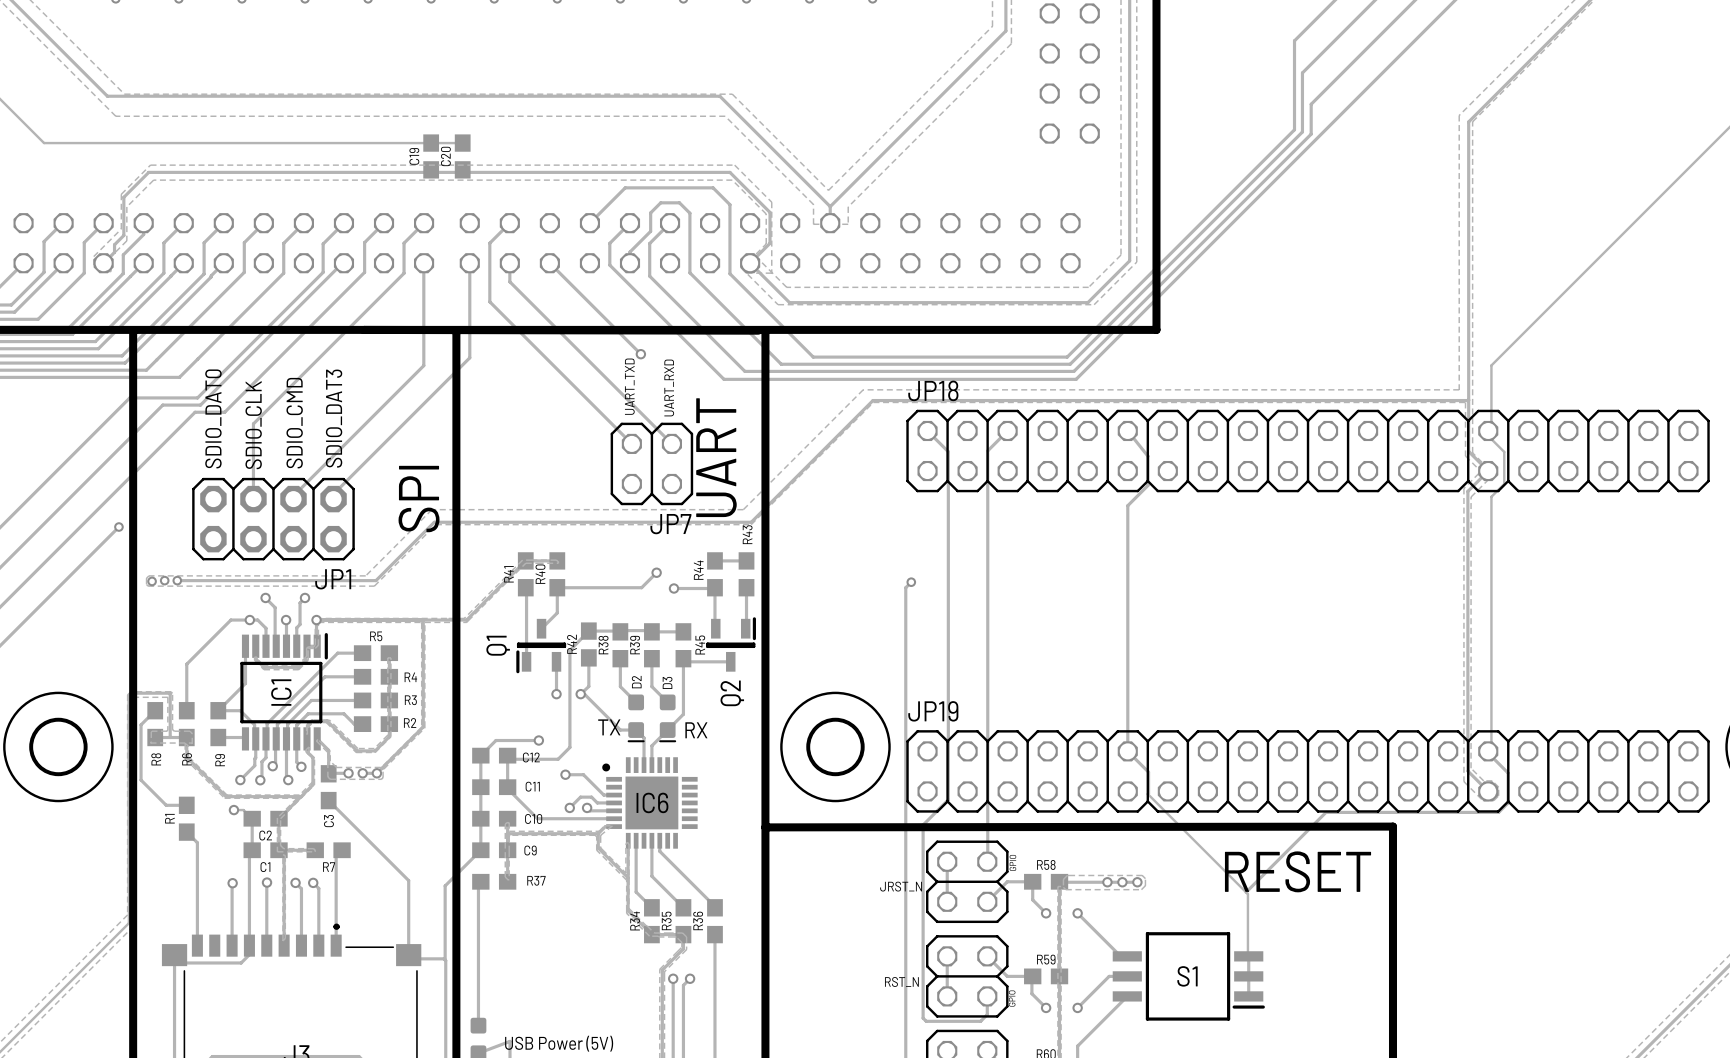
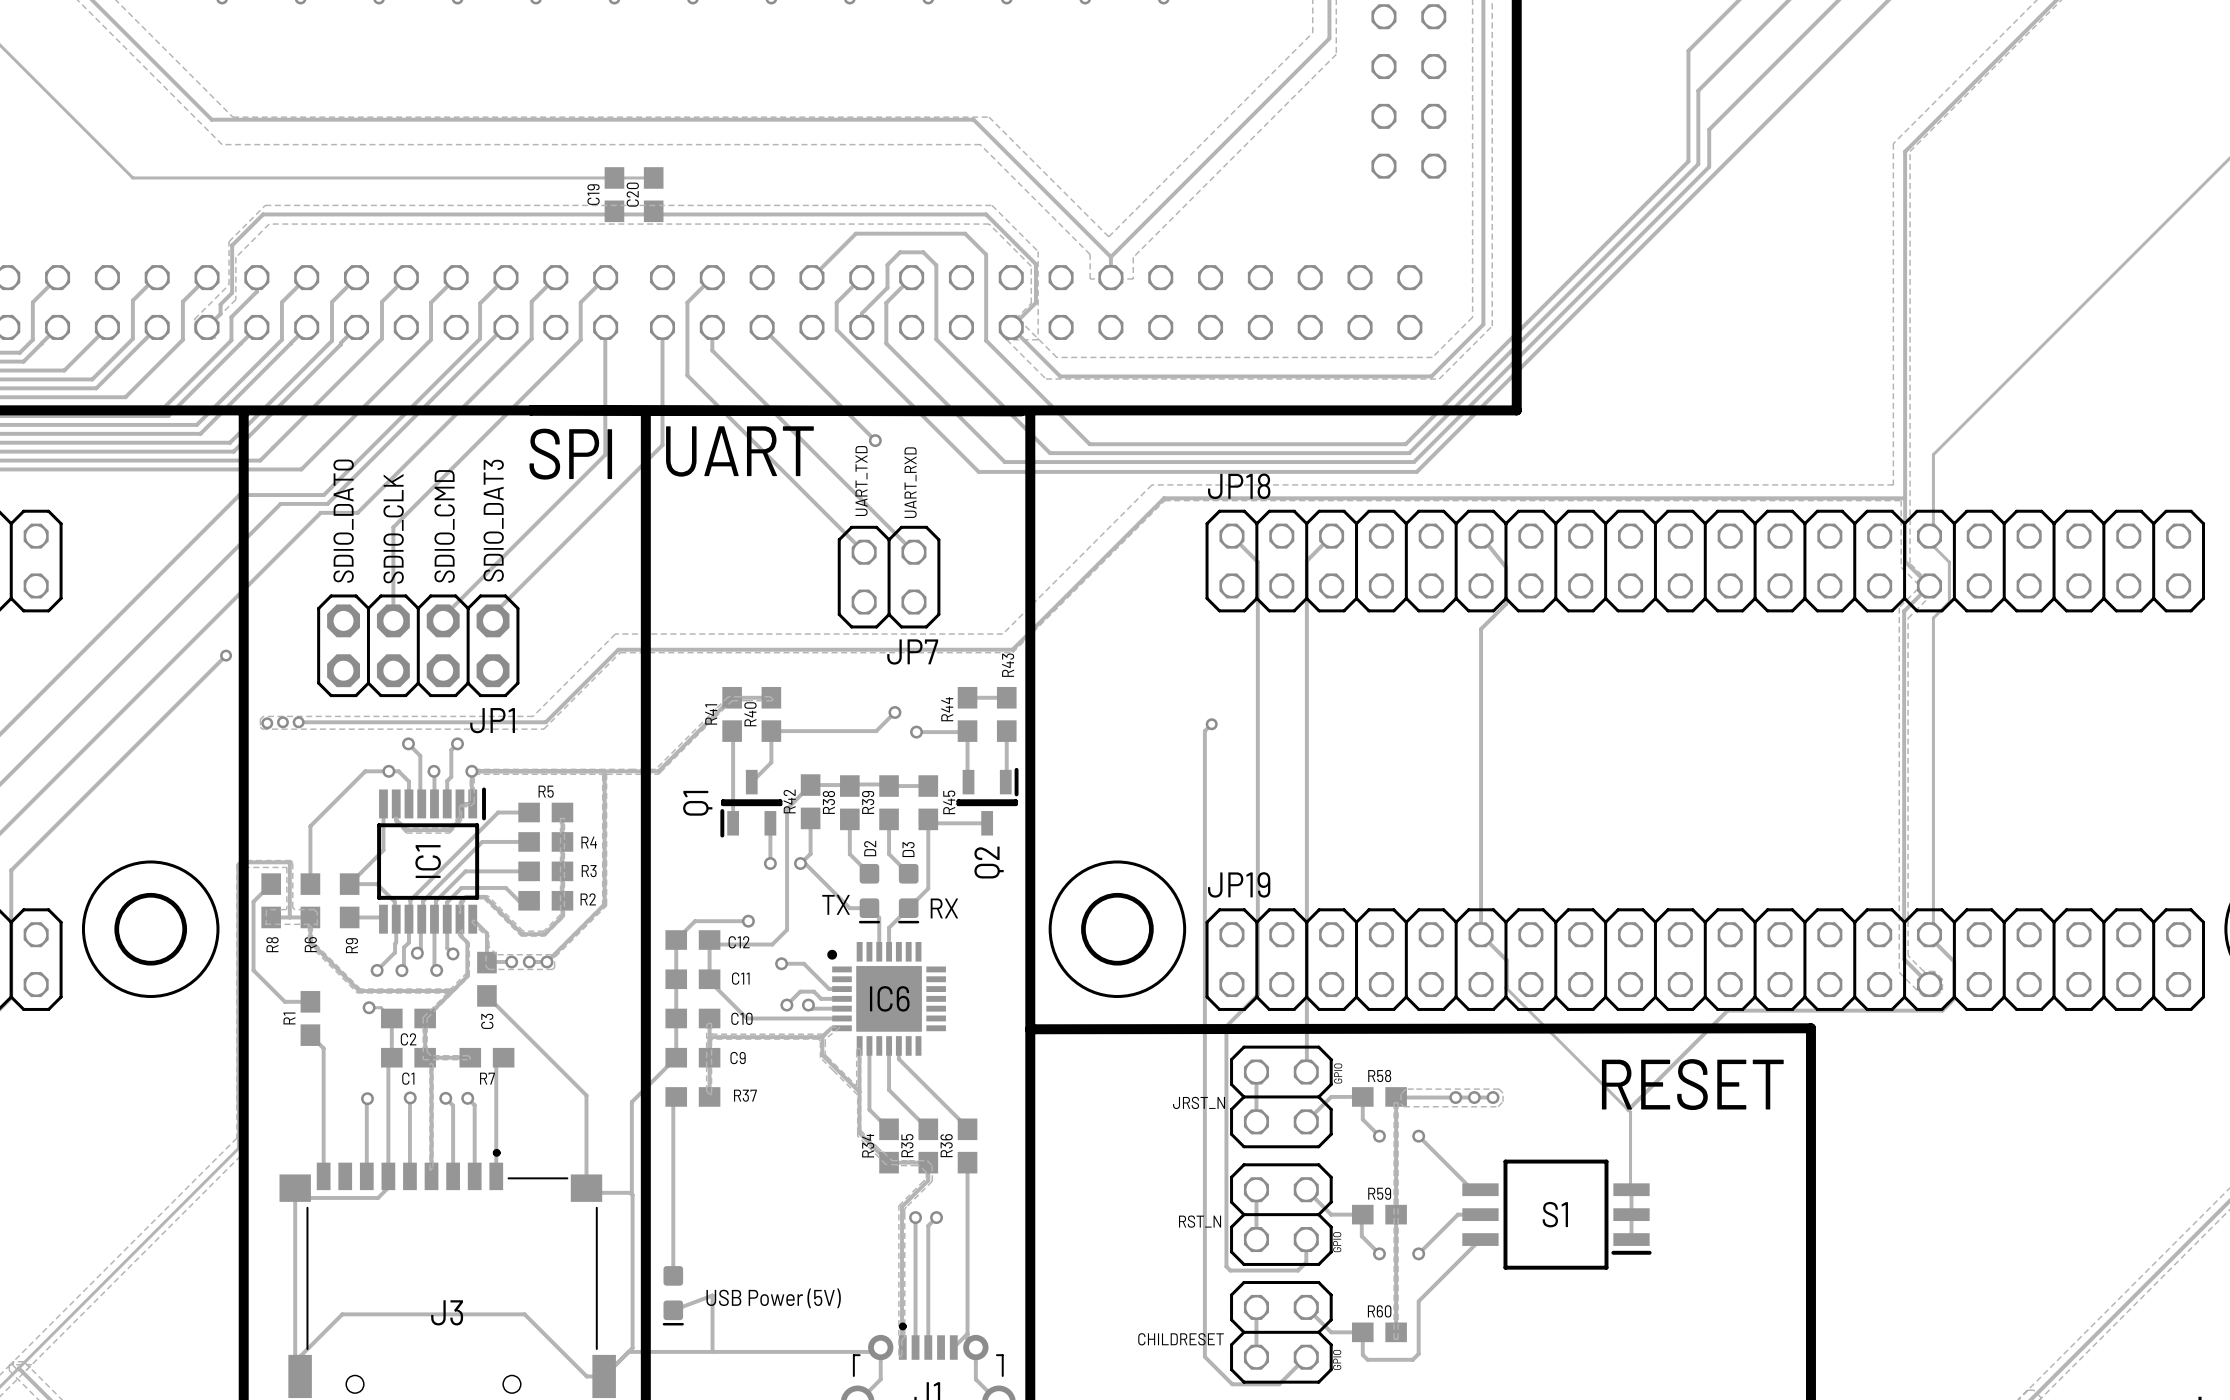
text rotation: 0° (716, 457) -> 90° clockwise (739, 451)
text position: UART (716, 457) -> UART (739, 451)
text rotation: 0° (419, 499) -> 90° clockwise (570, 454)

